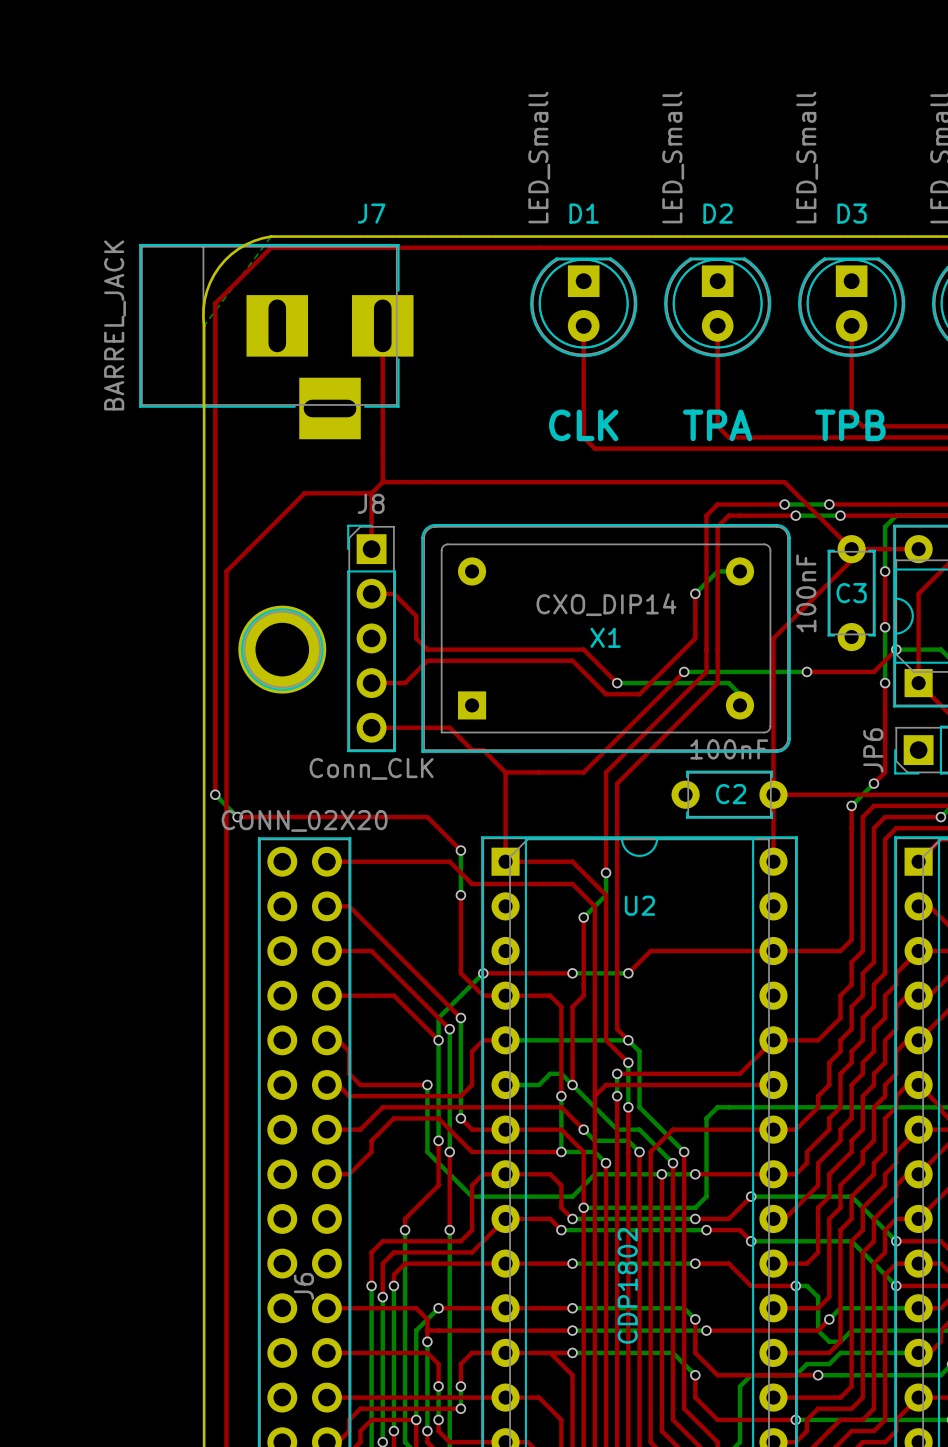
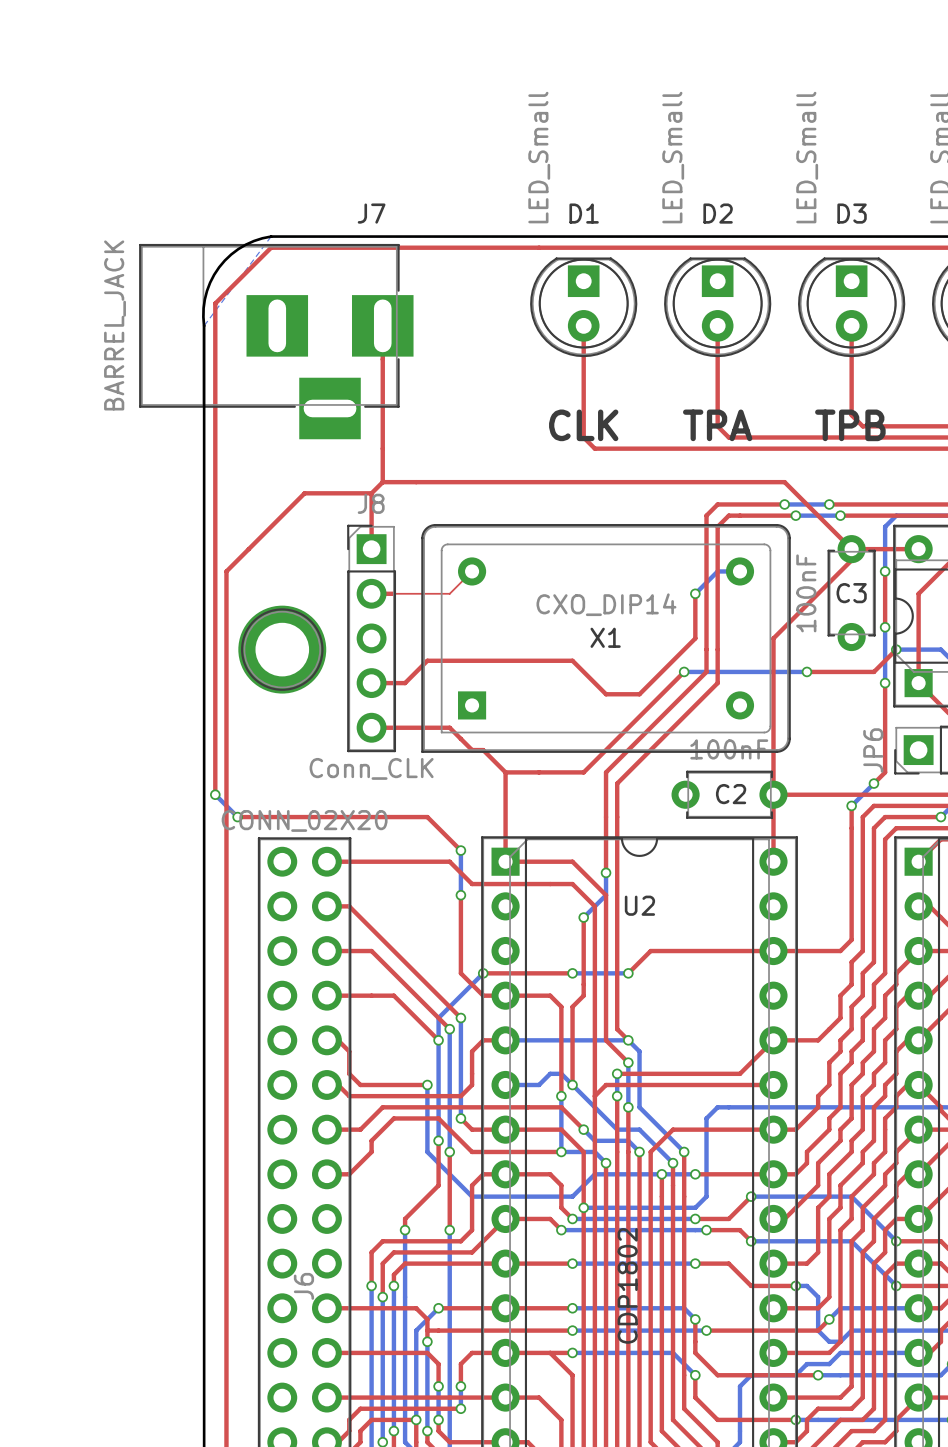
top track: (393, 593) (416, 616) (416, 638) (427, 649) (583, 649) (617, 683) -> (393, 593) (449, 593) (472, 571)
bottom track: (617, 683) (728, 683) (740, 694) -> none
via: (617, 683) -> none

